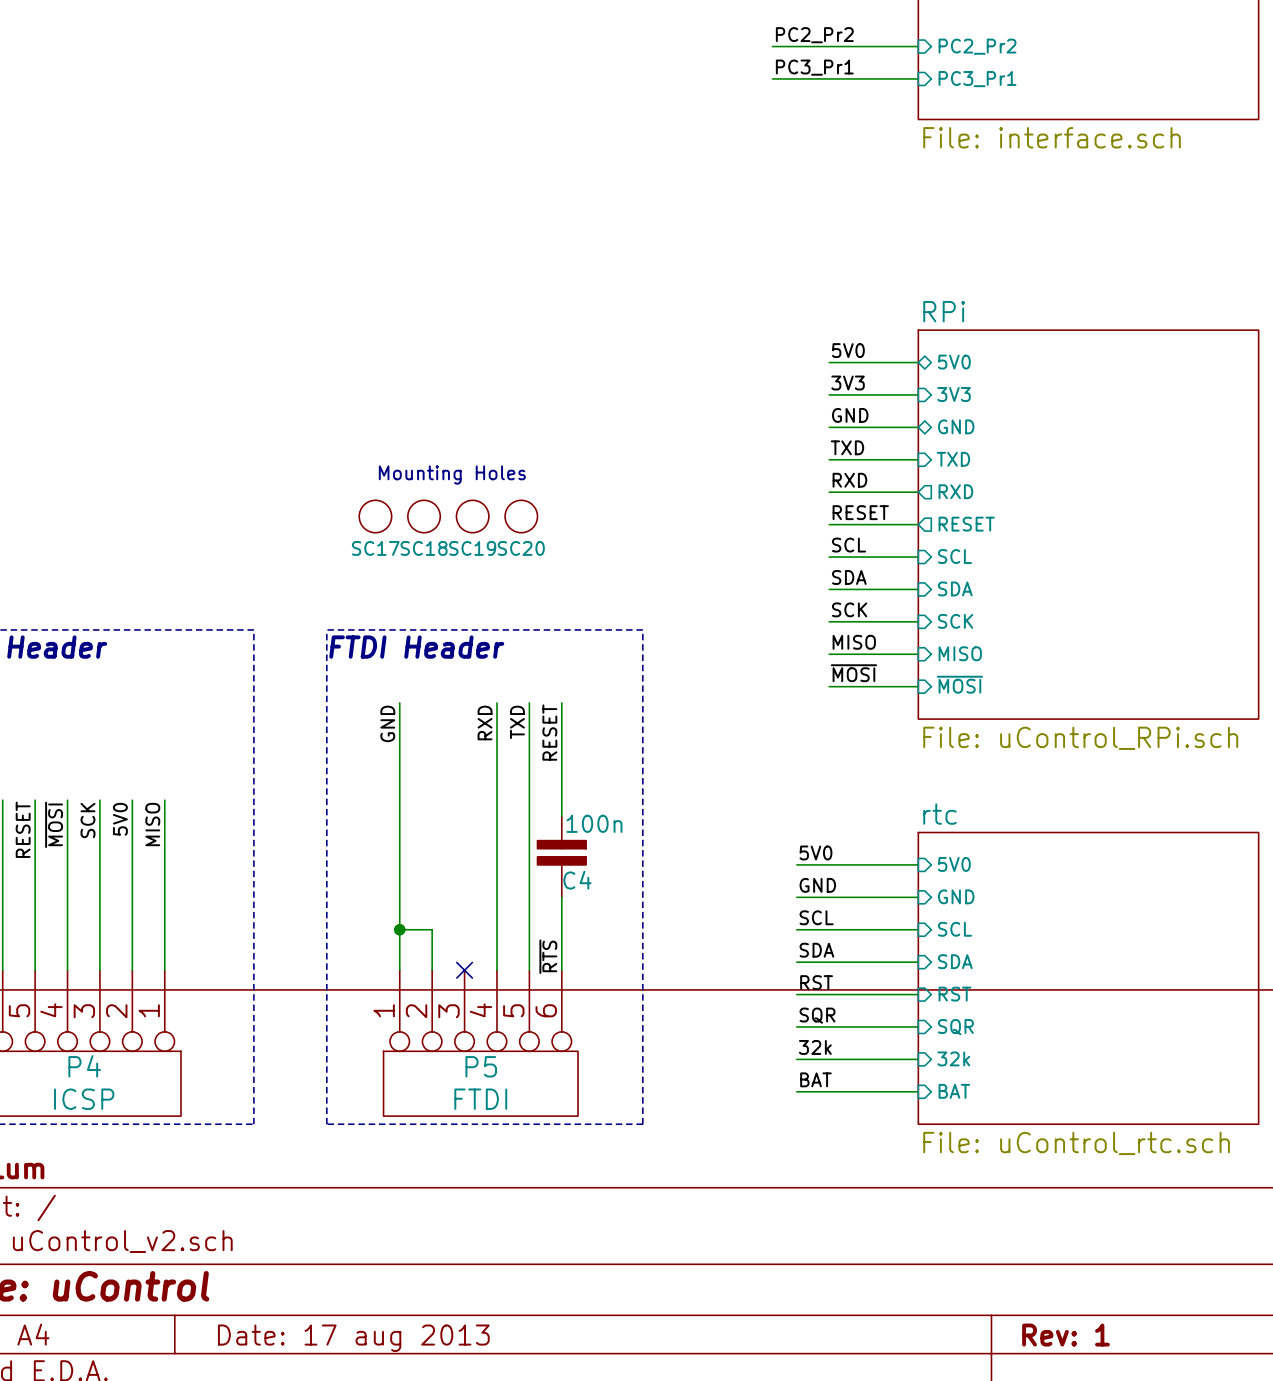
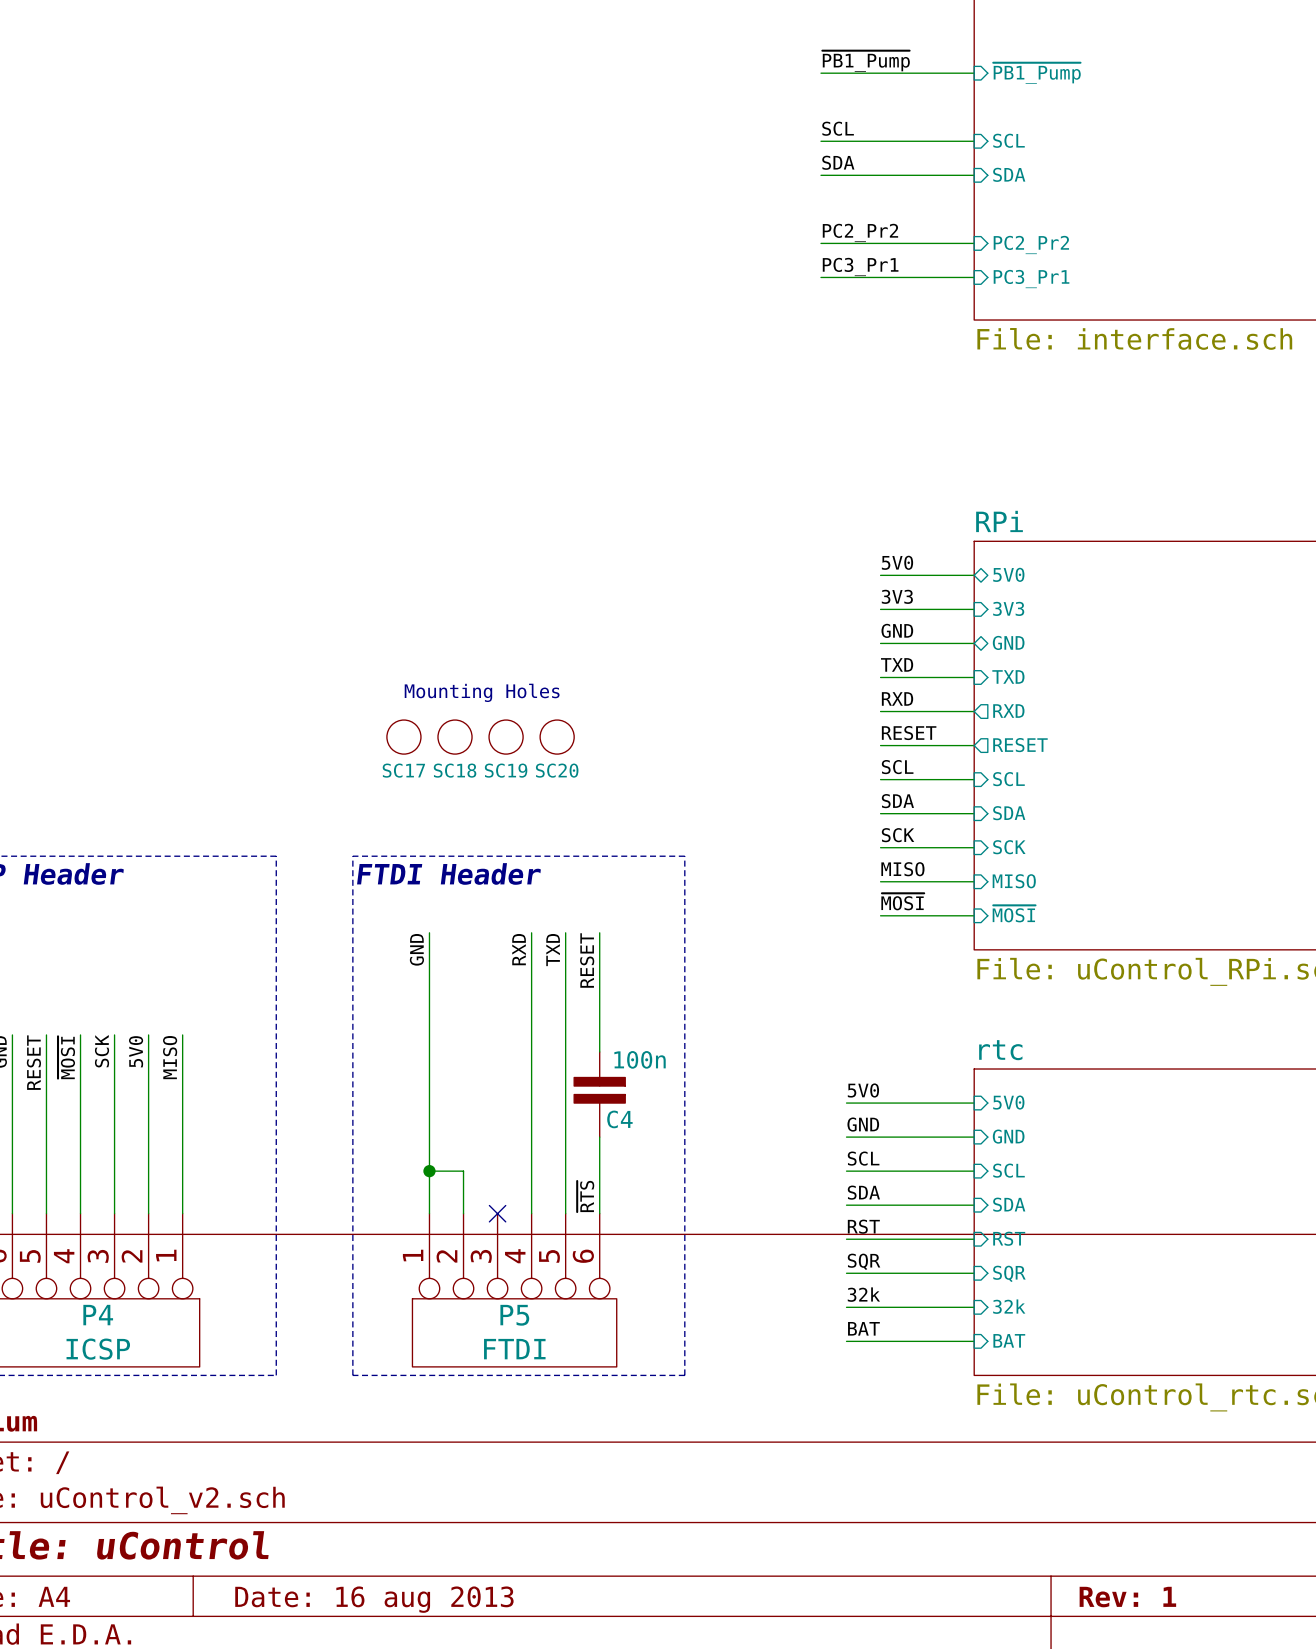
title block: Date: 17 aug 2013 (353, 1338) -> Date: 16 aug 2013 (374, 1599)

